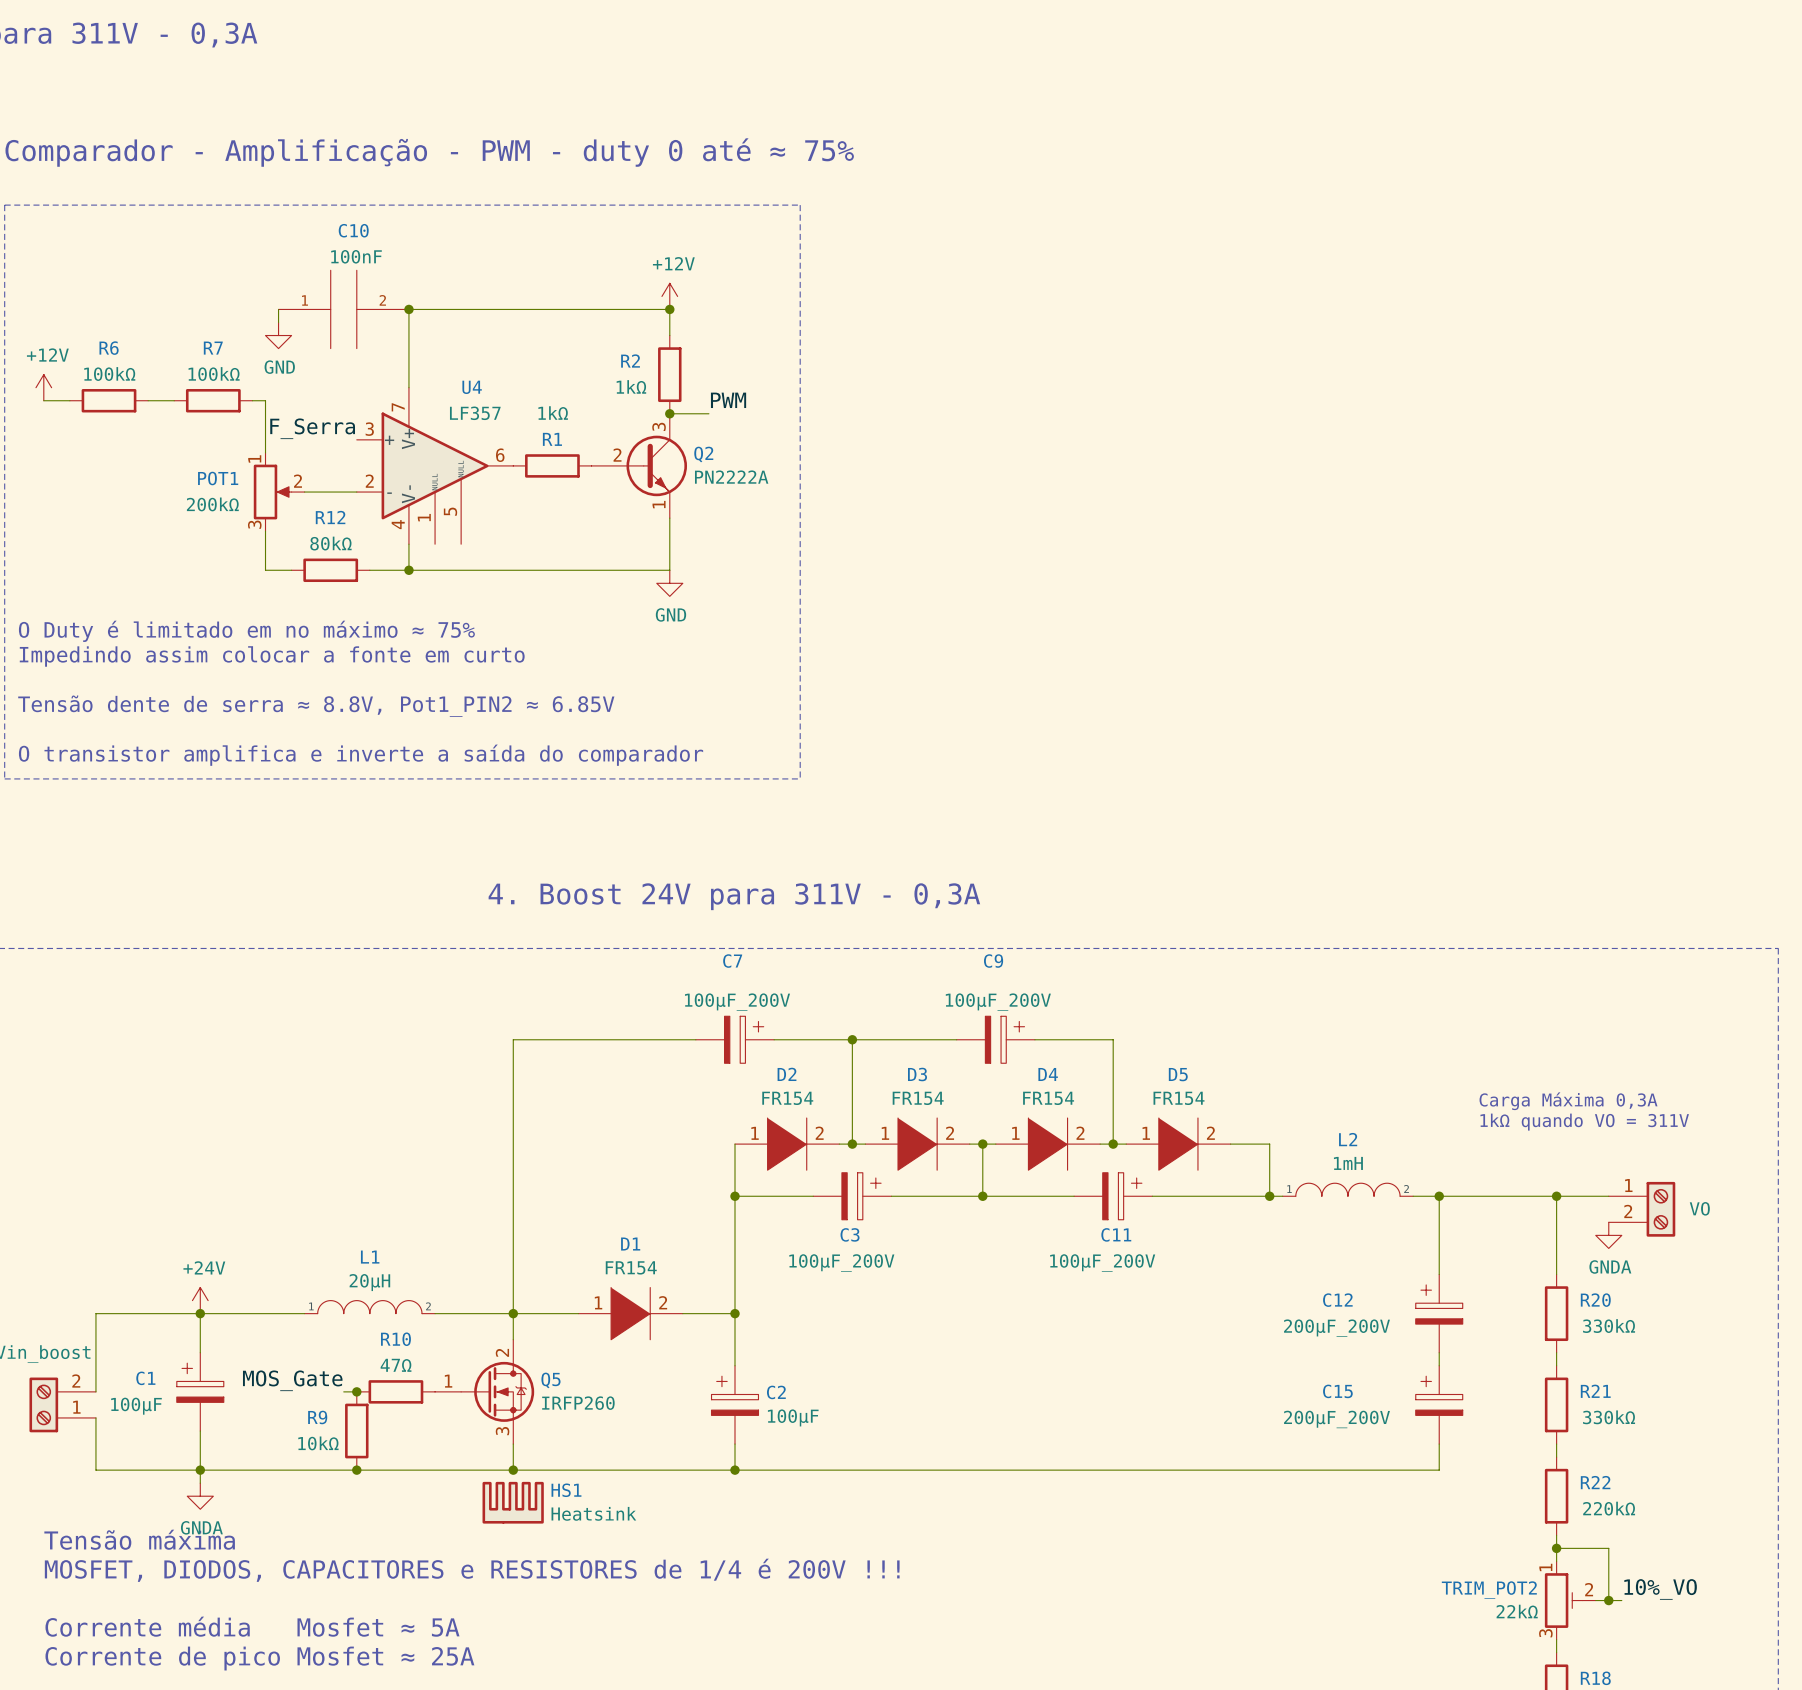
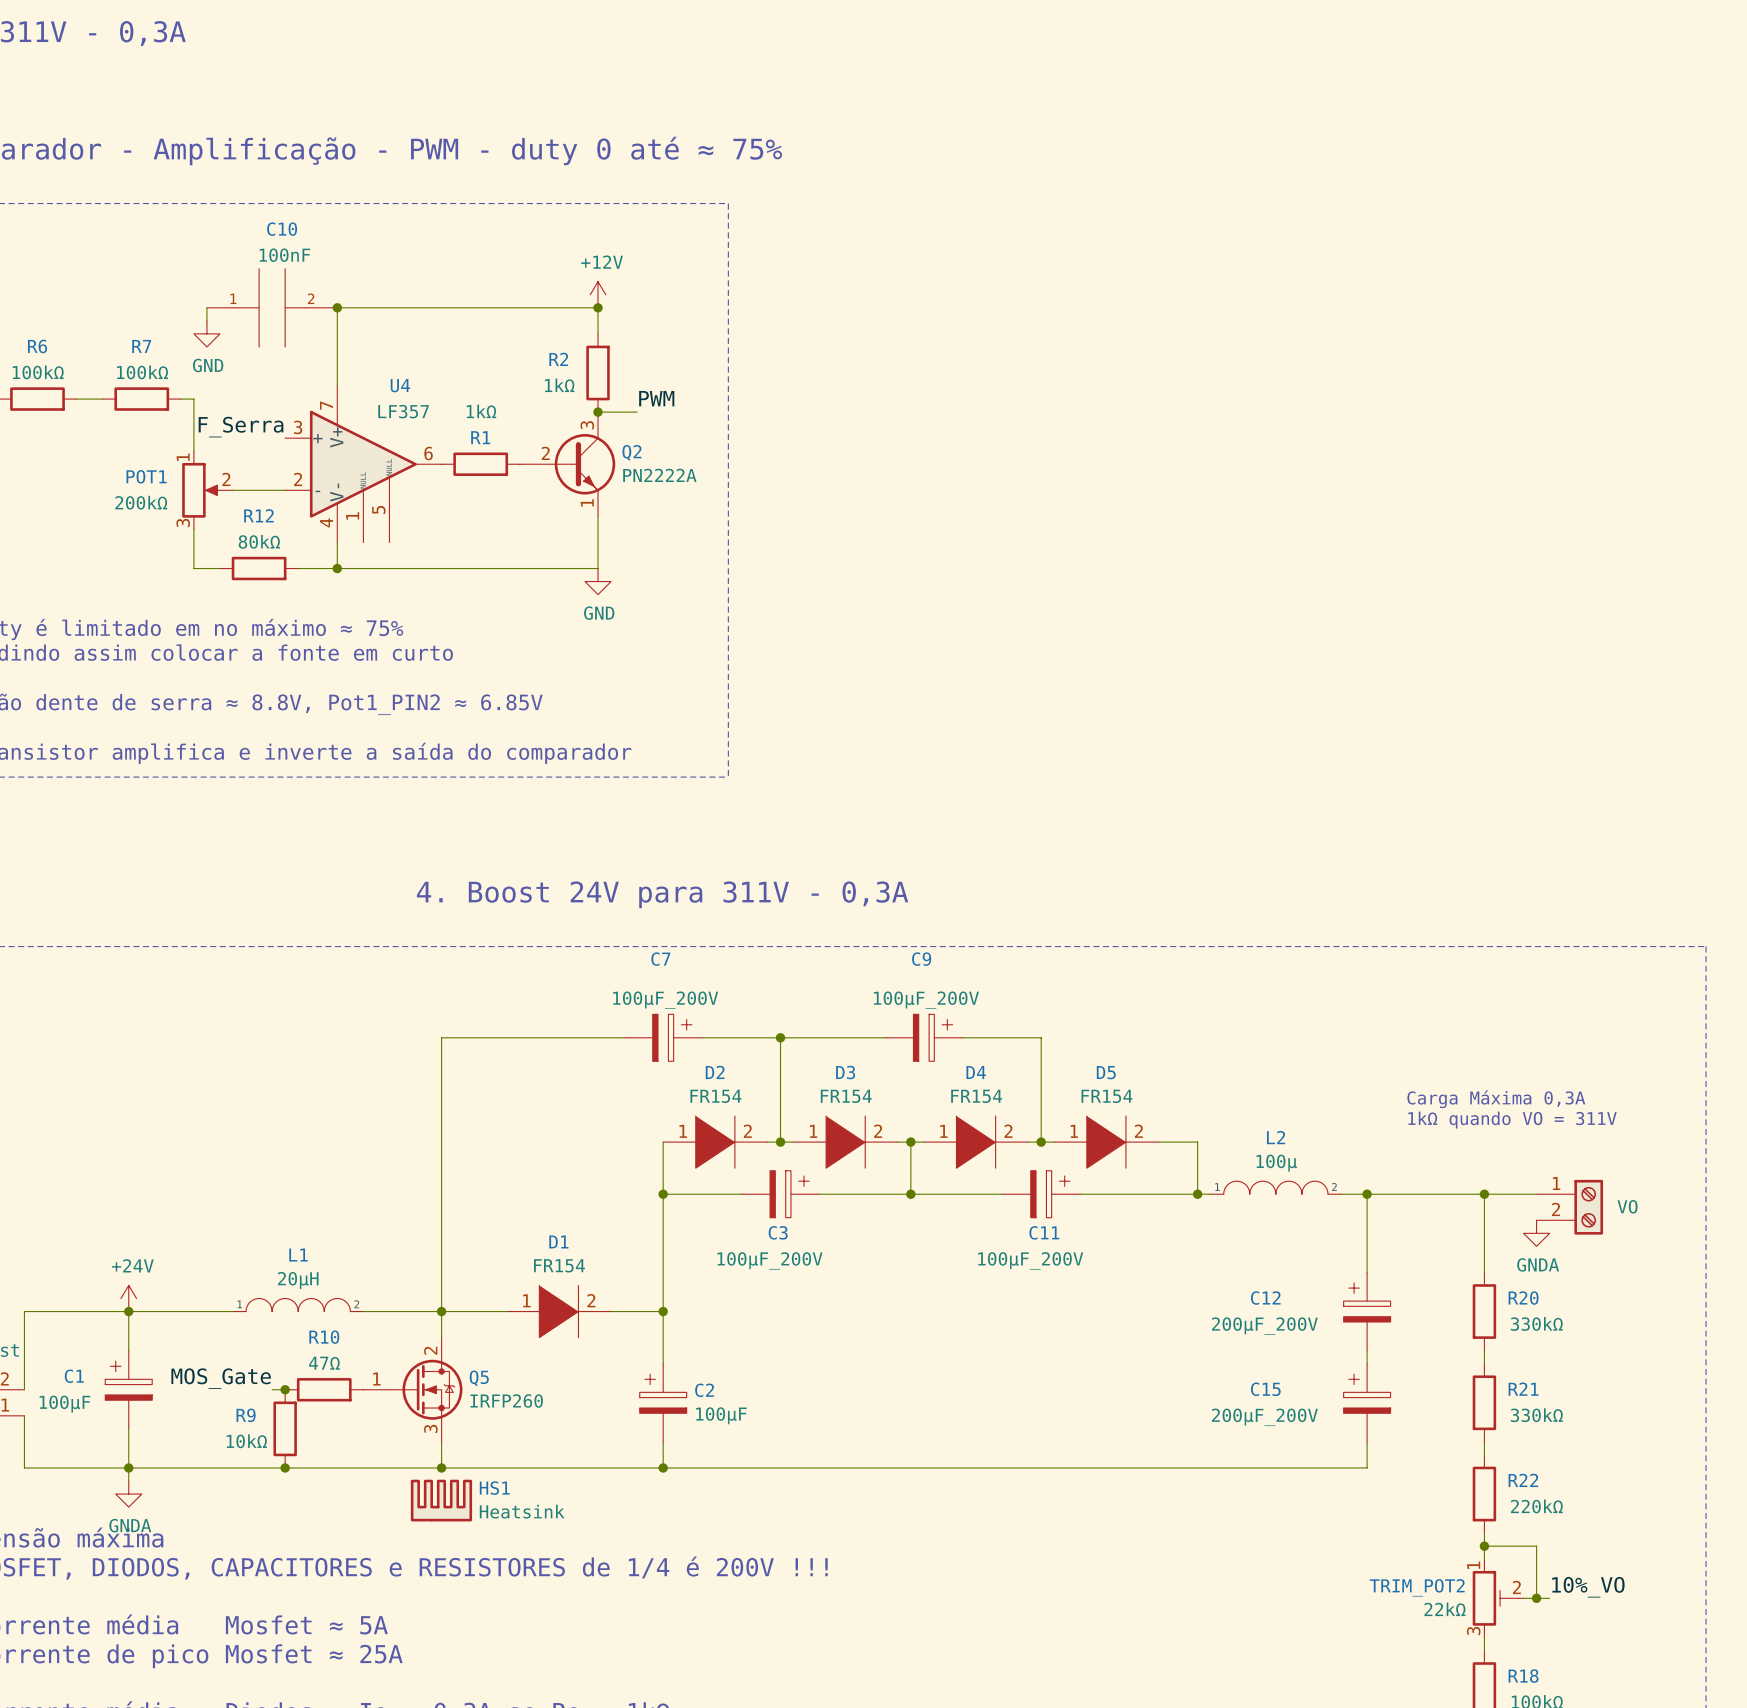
L2 value: 1mH (1348, 1163) -> 100µ (1276, 1163)

